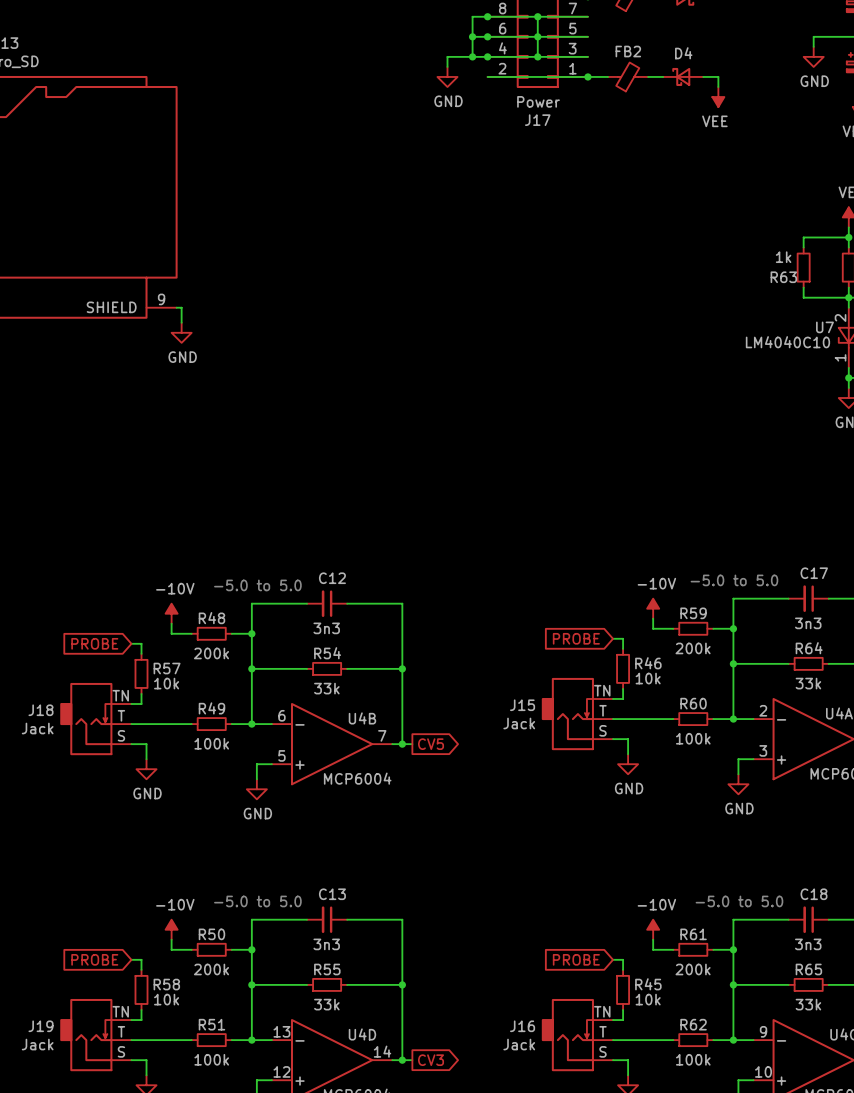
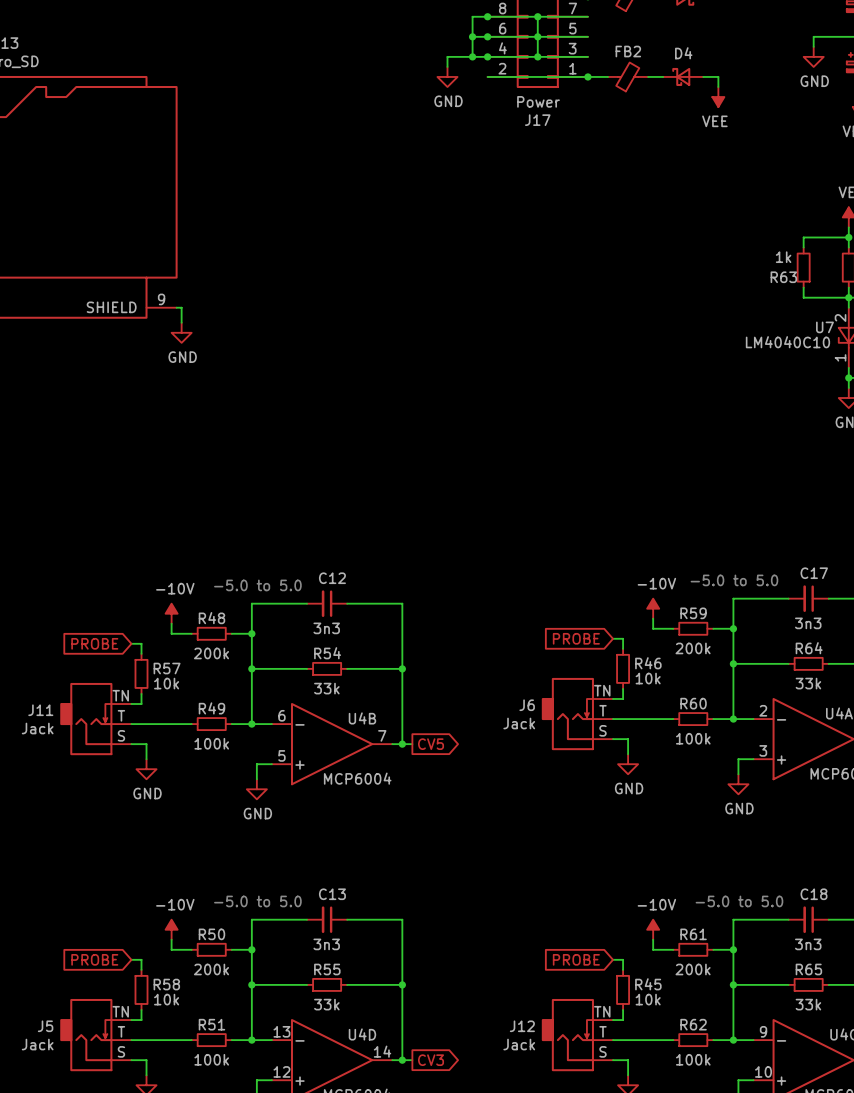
J15 name: J15 (522, 705) -> J6 (527, 705)
J18 name: J18 (41, 710) -> J11 (40, 710)
J19 name: J19 (41, 1026) -> J5 (45, 1026)
J16 name: J16 (522, 1026) -> J12 (522, 1026)

